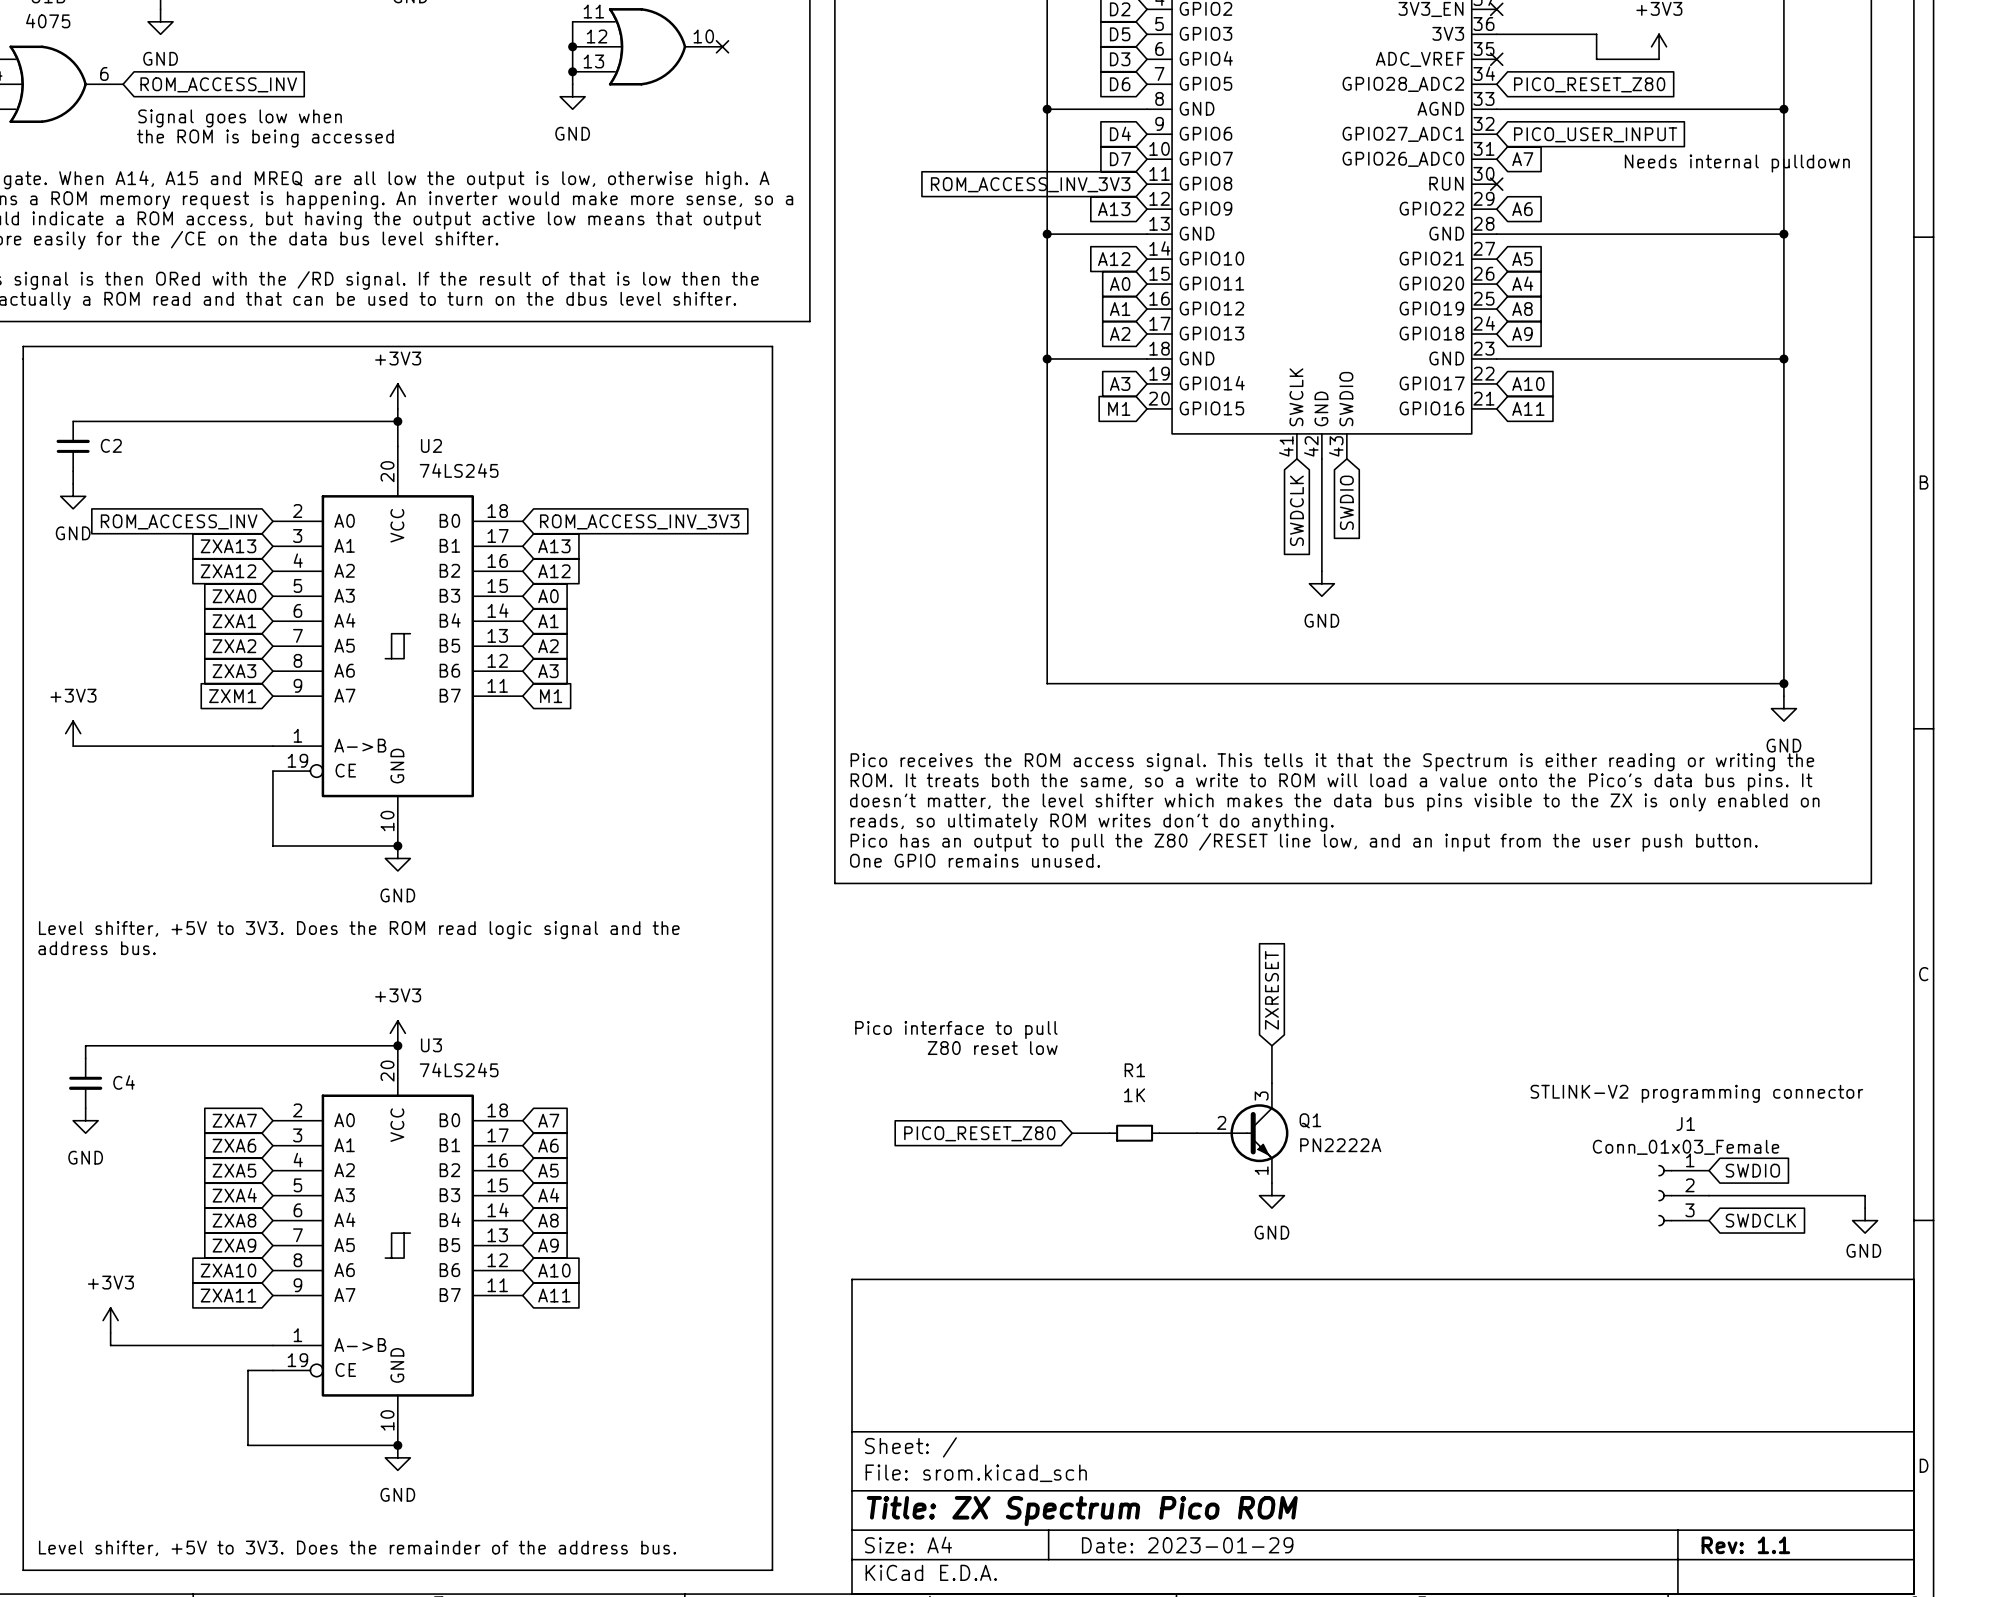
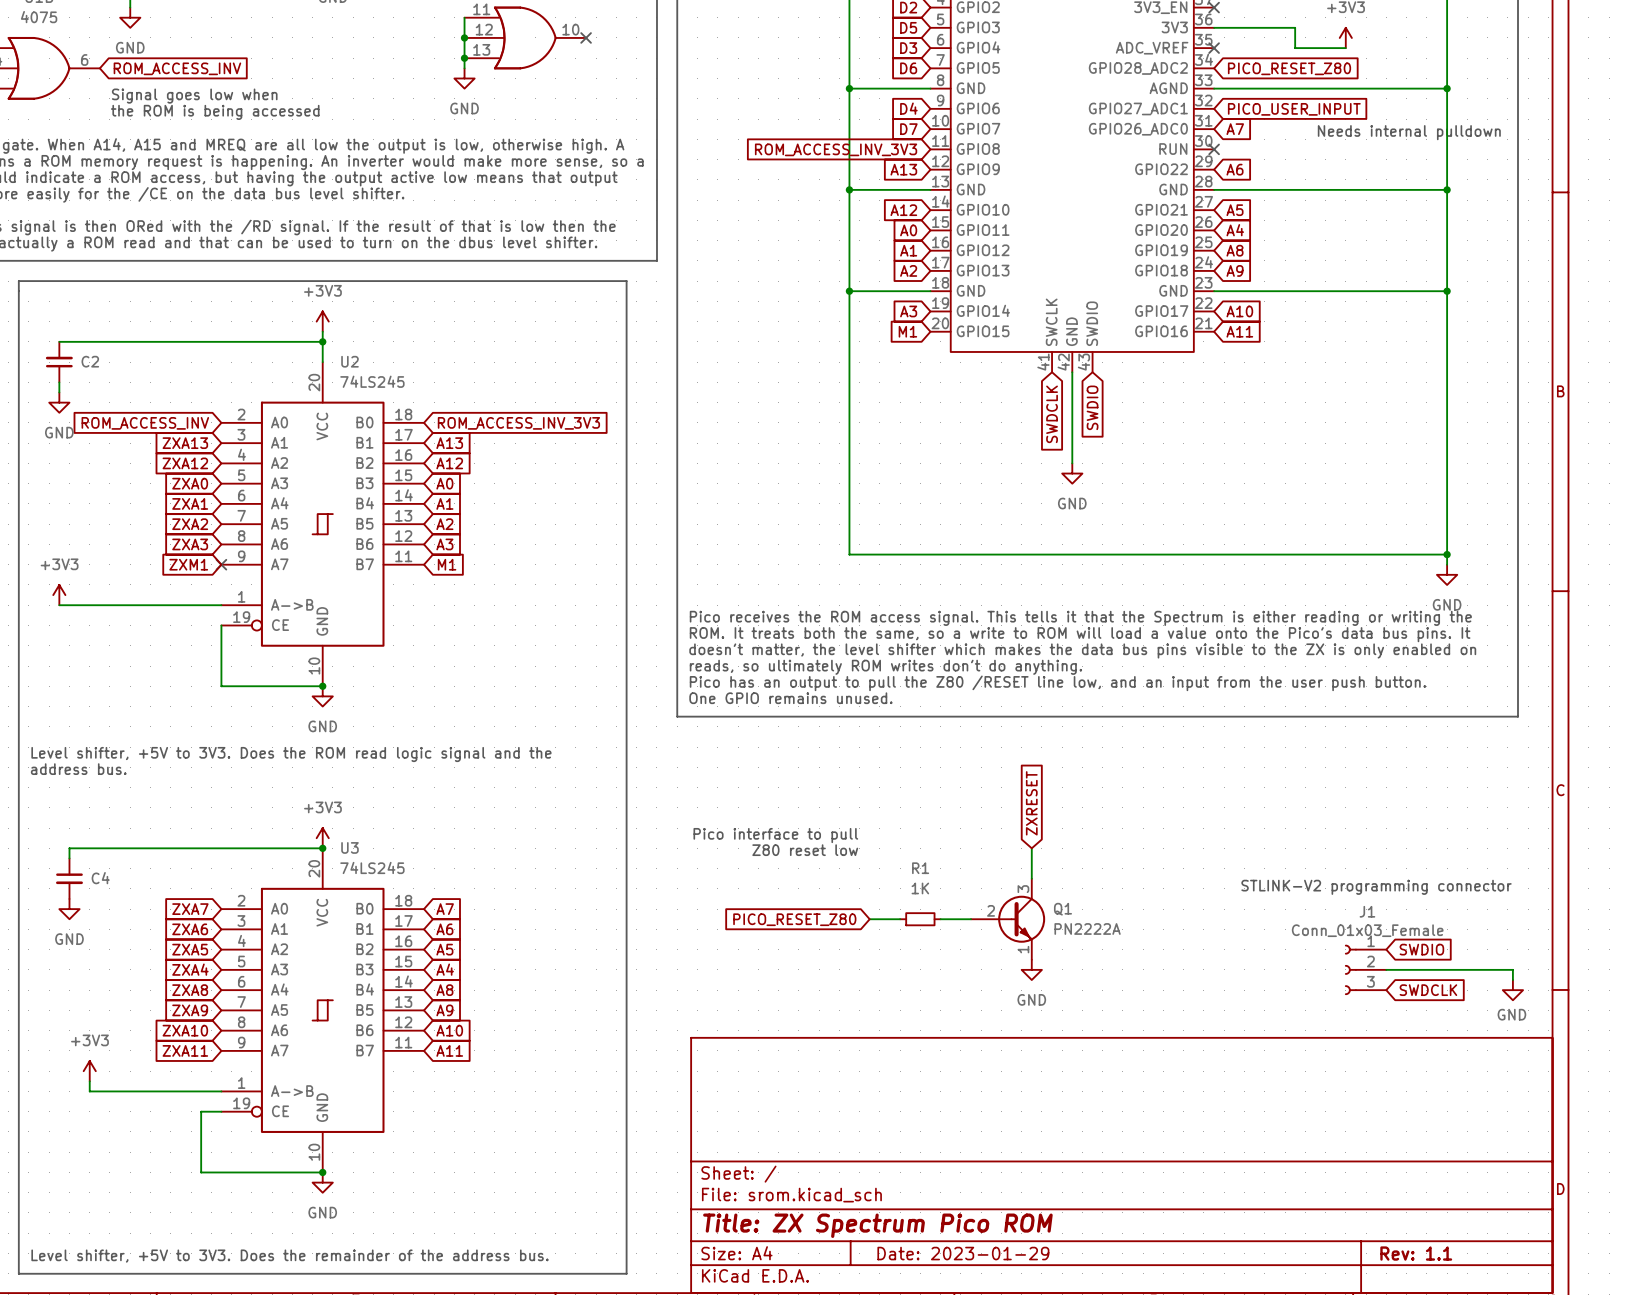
no-connect mark: none -> (221, 564)

